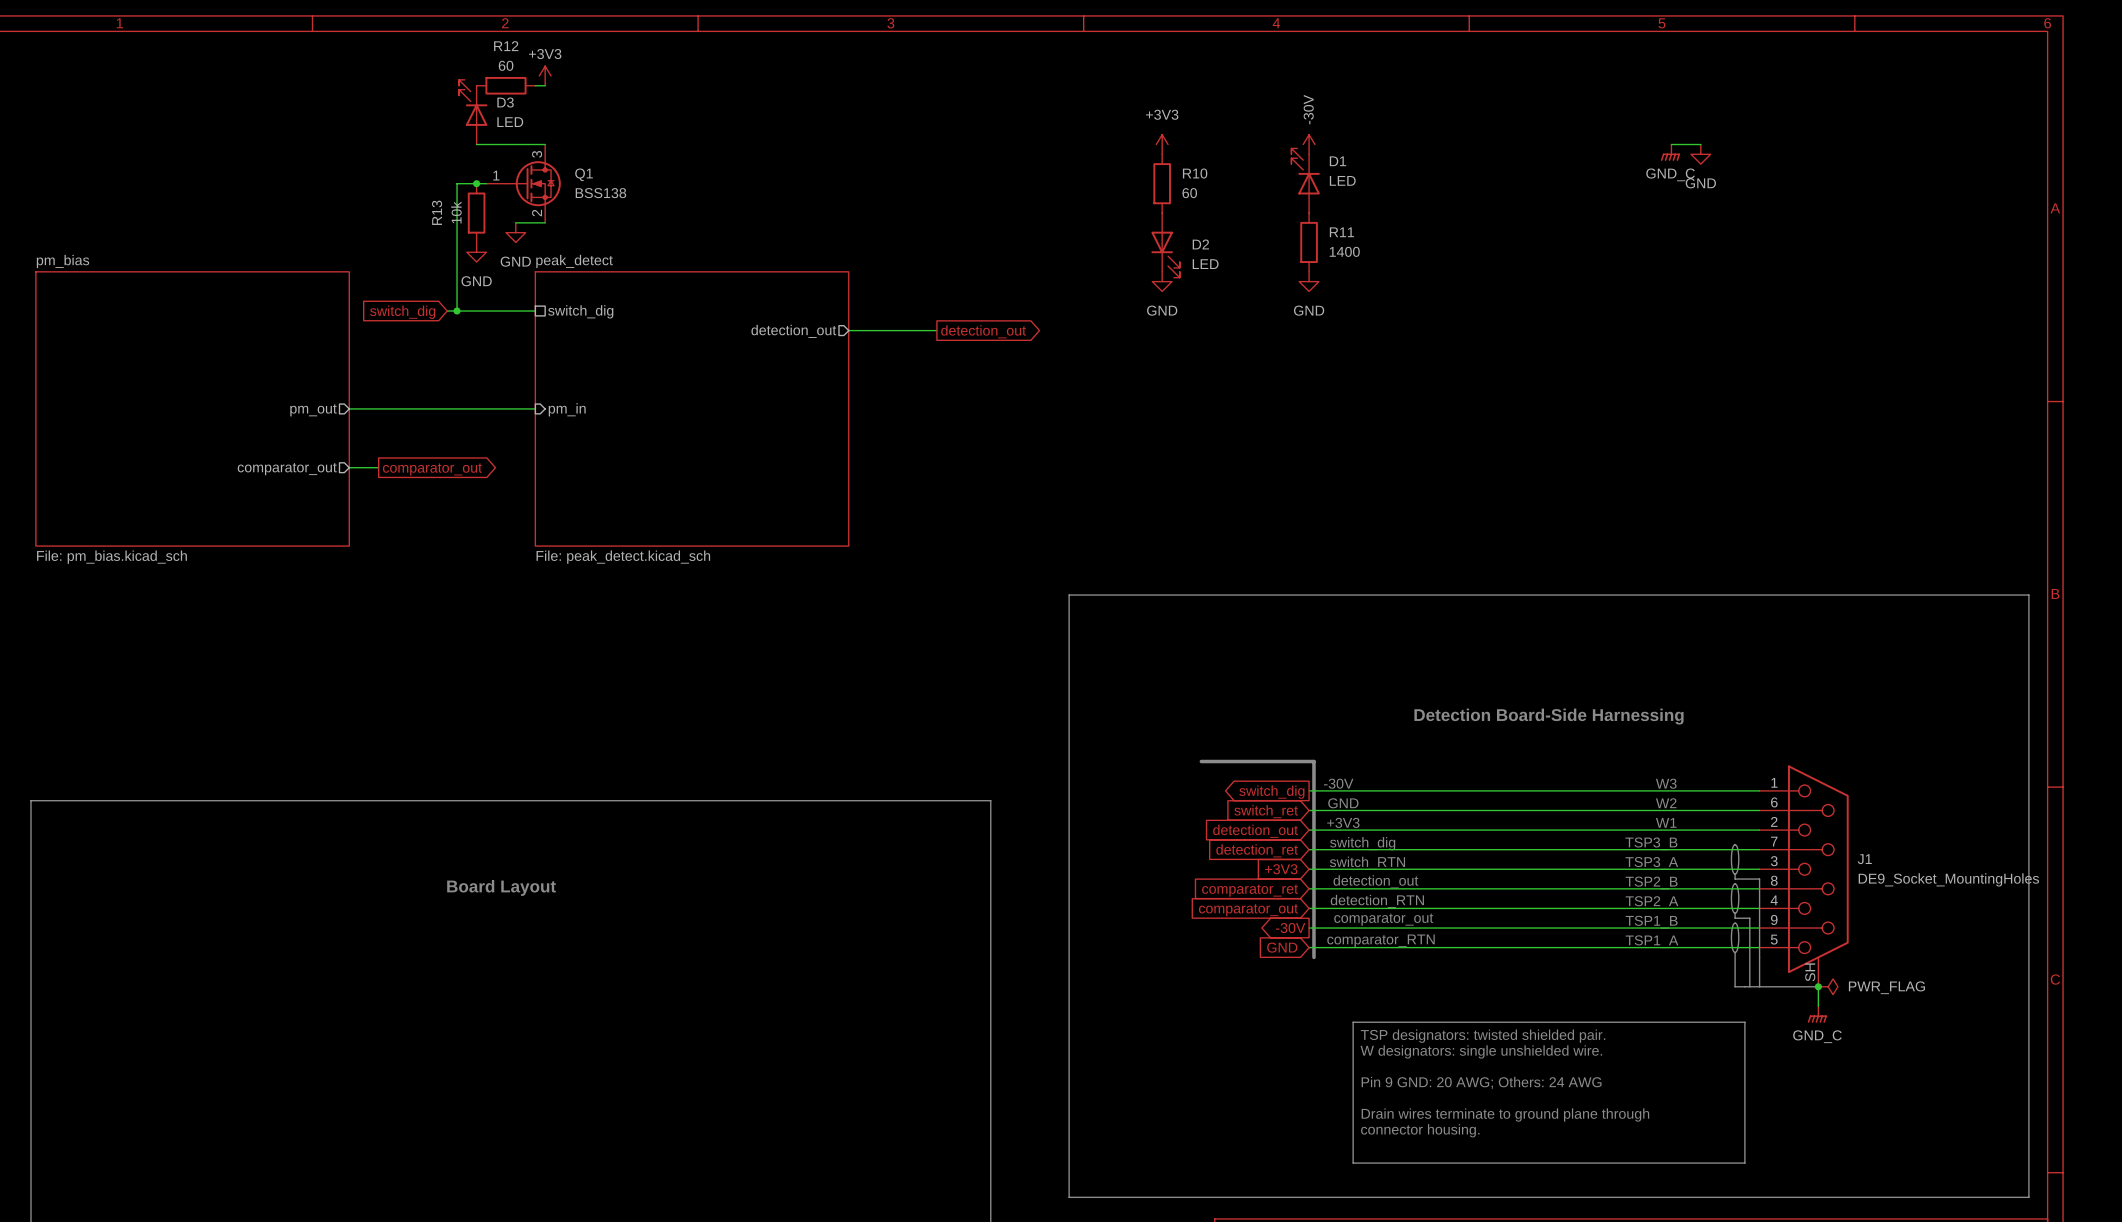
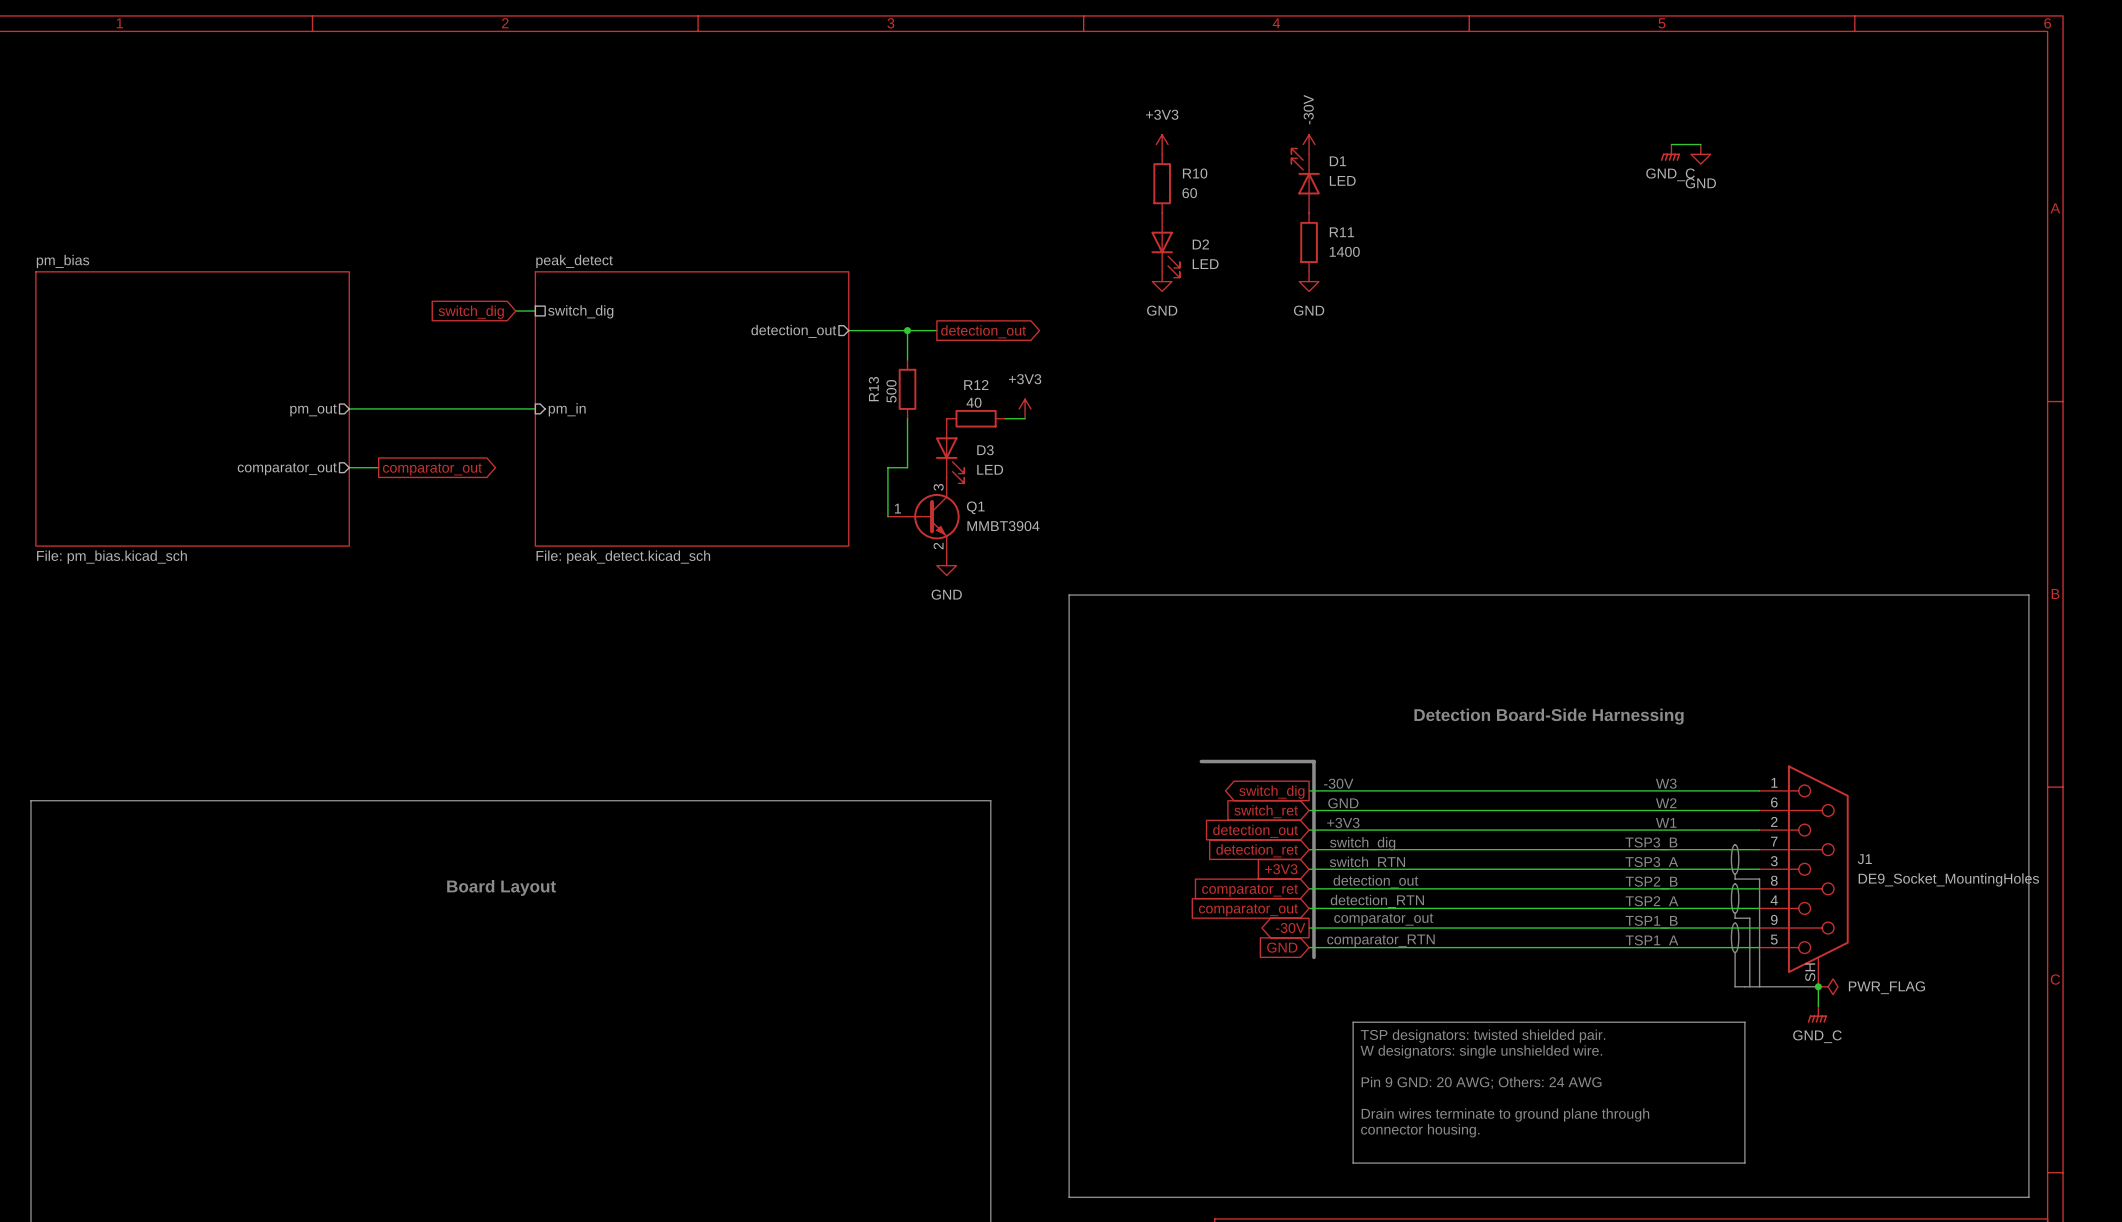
R12 name position: R12 (506, 46) -> R12 (976, 385)
R12 value: 60 (506, 65) -> 40 (974, 402)
power symbol: +3V3 (545, 75) -> none
R12 position: (505, 85) -> (976, 418)
wire: (535, 85) (545, 85) -> none
D3 rotation: 0° (473, 102) -> 180° (950, 460)
D3 position: (473, 112) -> (950, 451)
wire: (476, 144) (545, 144) -> none
Q1 symbol: [486, 144, 561, 223] -> [887, 477, 960, 556]
junction: (476, 183) -> none
wire: (486, 183) (457, 183) (457, 311) -> none
Q1 value: BSS138 (600, 193) -> MMBT3904 (1003, 526)
R13 name position: R13 (437, 212) -> R13 (873, 389)
R13 value: 10k (456, 212) -> 500 (891, 391)
R13 position: (476, 213) -> (907, 389)
wire: (515, 222) (545, 222) -> none
power symbol: GND (515, 232) -> none
power symbol: GND (476, 252) -> none
wire: (447, 311) (515, 311) -> none
junction: (457, 311) -> none
global label position: switch_dig (402, 312) -> switch_dig (471, 312)
wire: none -> (907, 330) (907, 359)
junction: none -> (907, 330)
power symbol: none -> +3V3 (1025, 408)
wire: none -> (907, 418) (907, 467) (887, 467) (887, 516)
wire: none -> (1005, 418) (1025, 418)
power symbol: none -> GND (946, 565)

